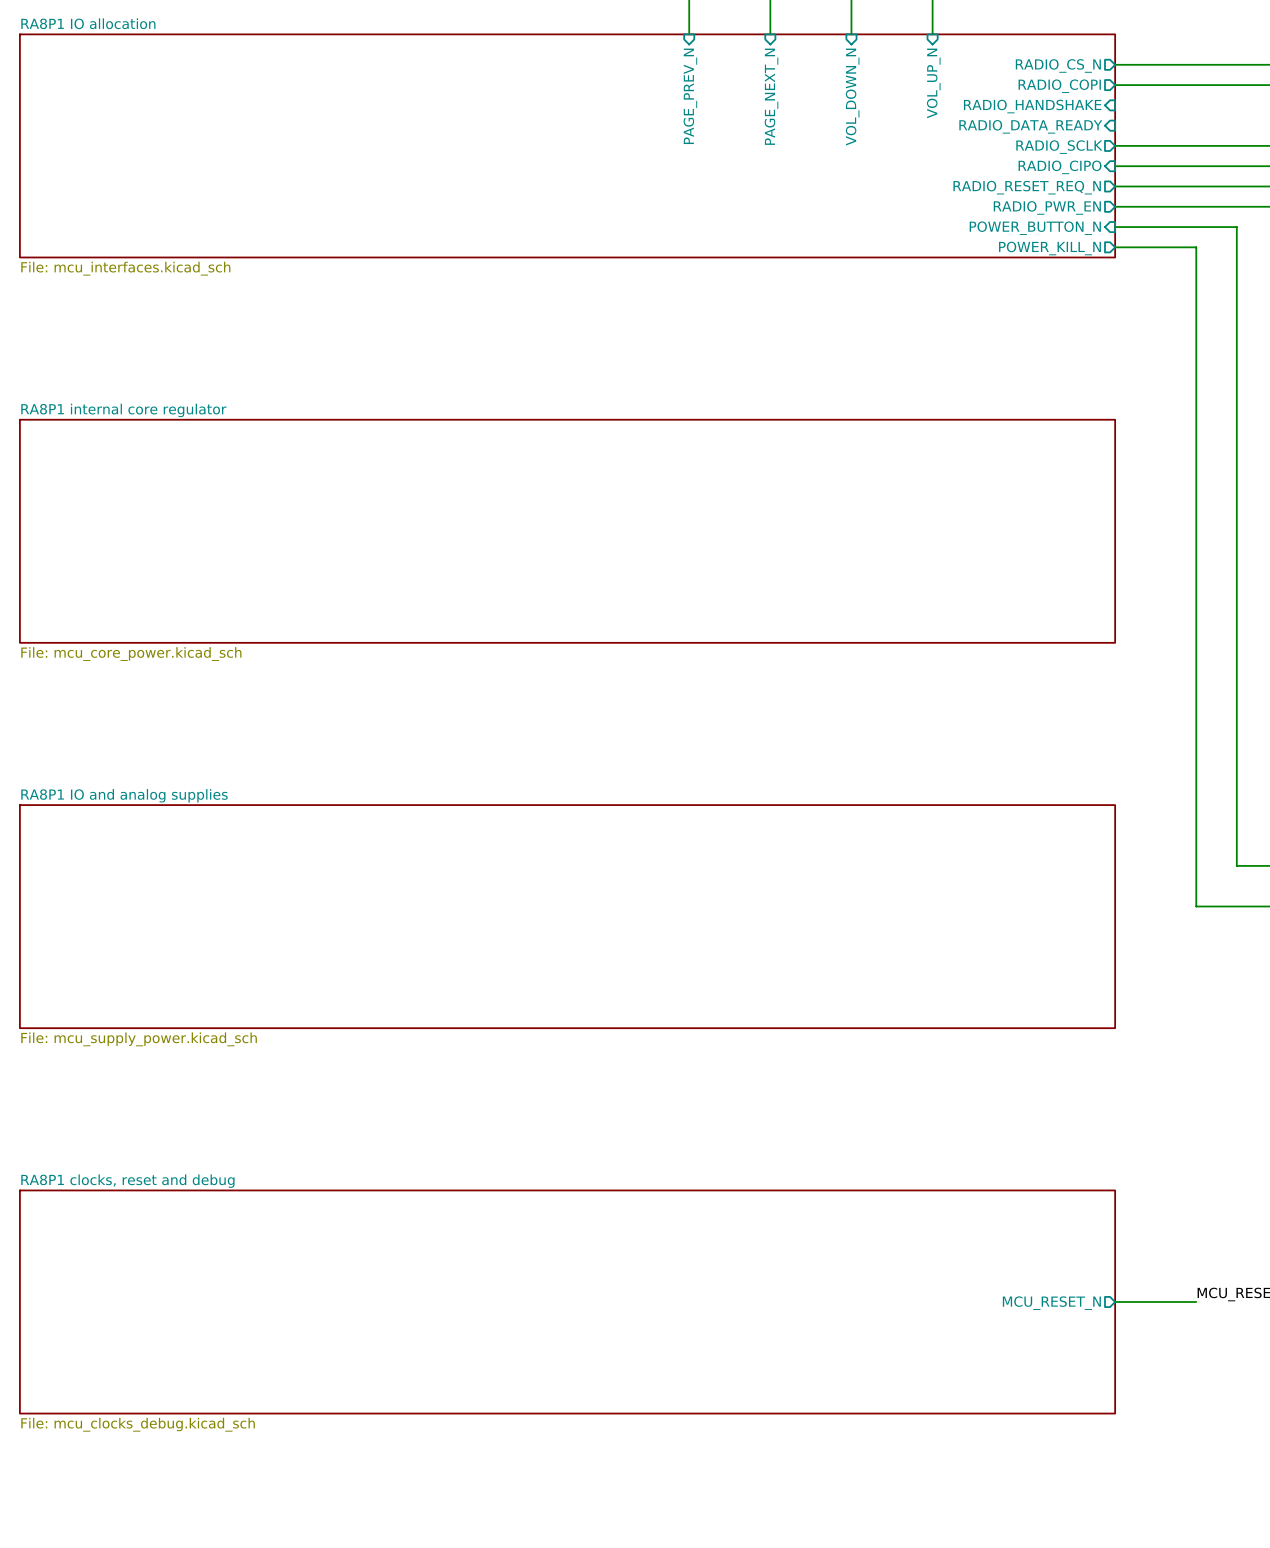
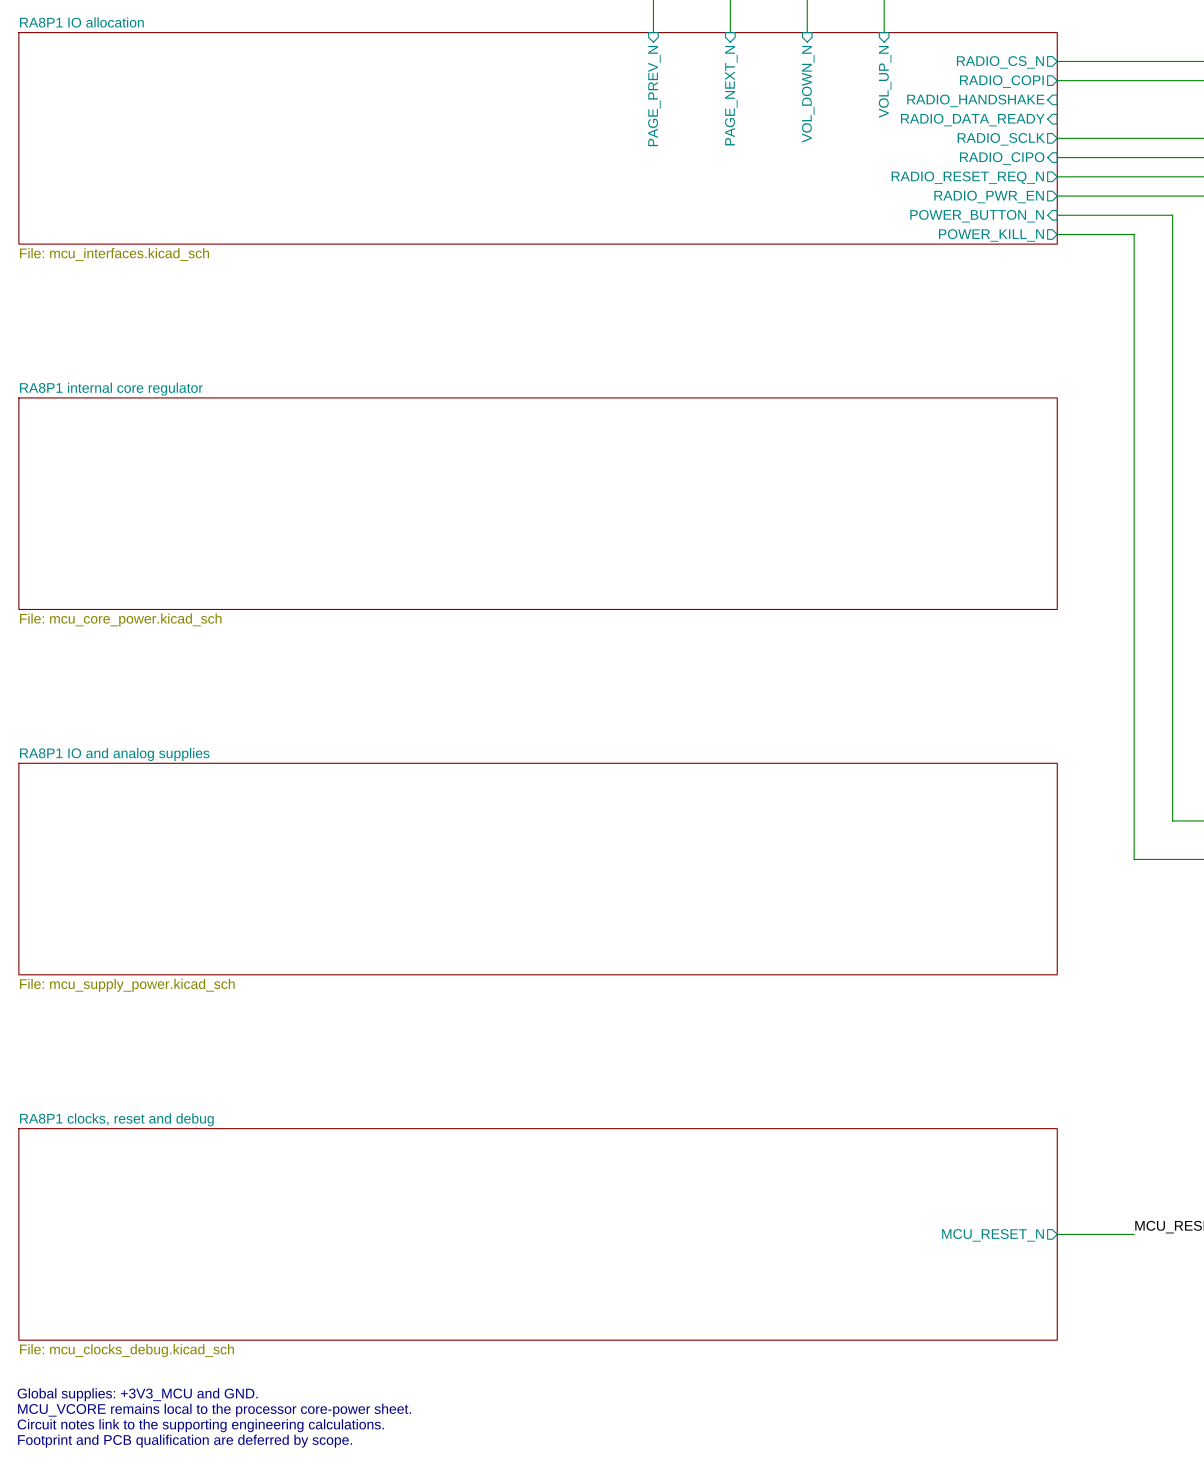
text: none -> Global supplies: +3V3_MCU and GND. (137, 1394)
text: none -> MCU_VCORE remains local to the processor core-power sheet. (214, 1410)
text: none -> Circuit notes link to the supporting engineering calculations. (200, 1425)
text: none -> Footprint and PCB qualification are deferred by scope. (185, 1441)

